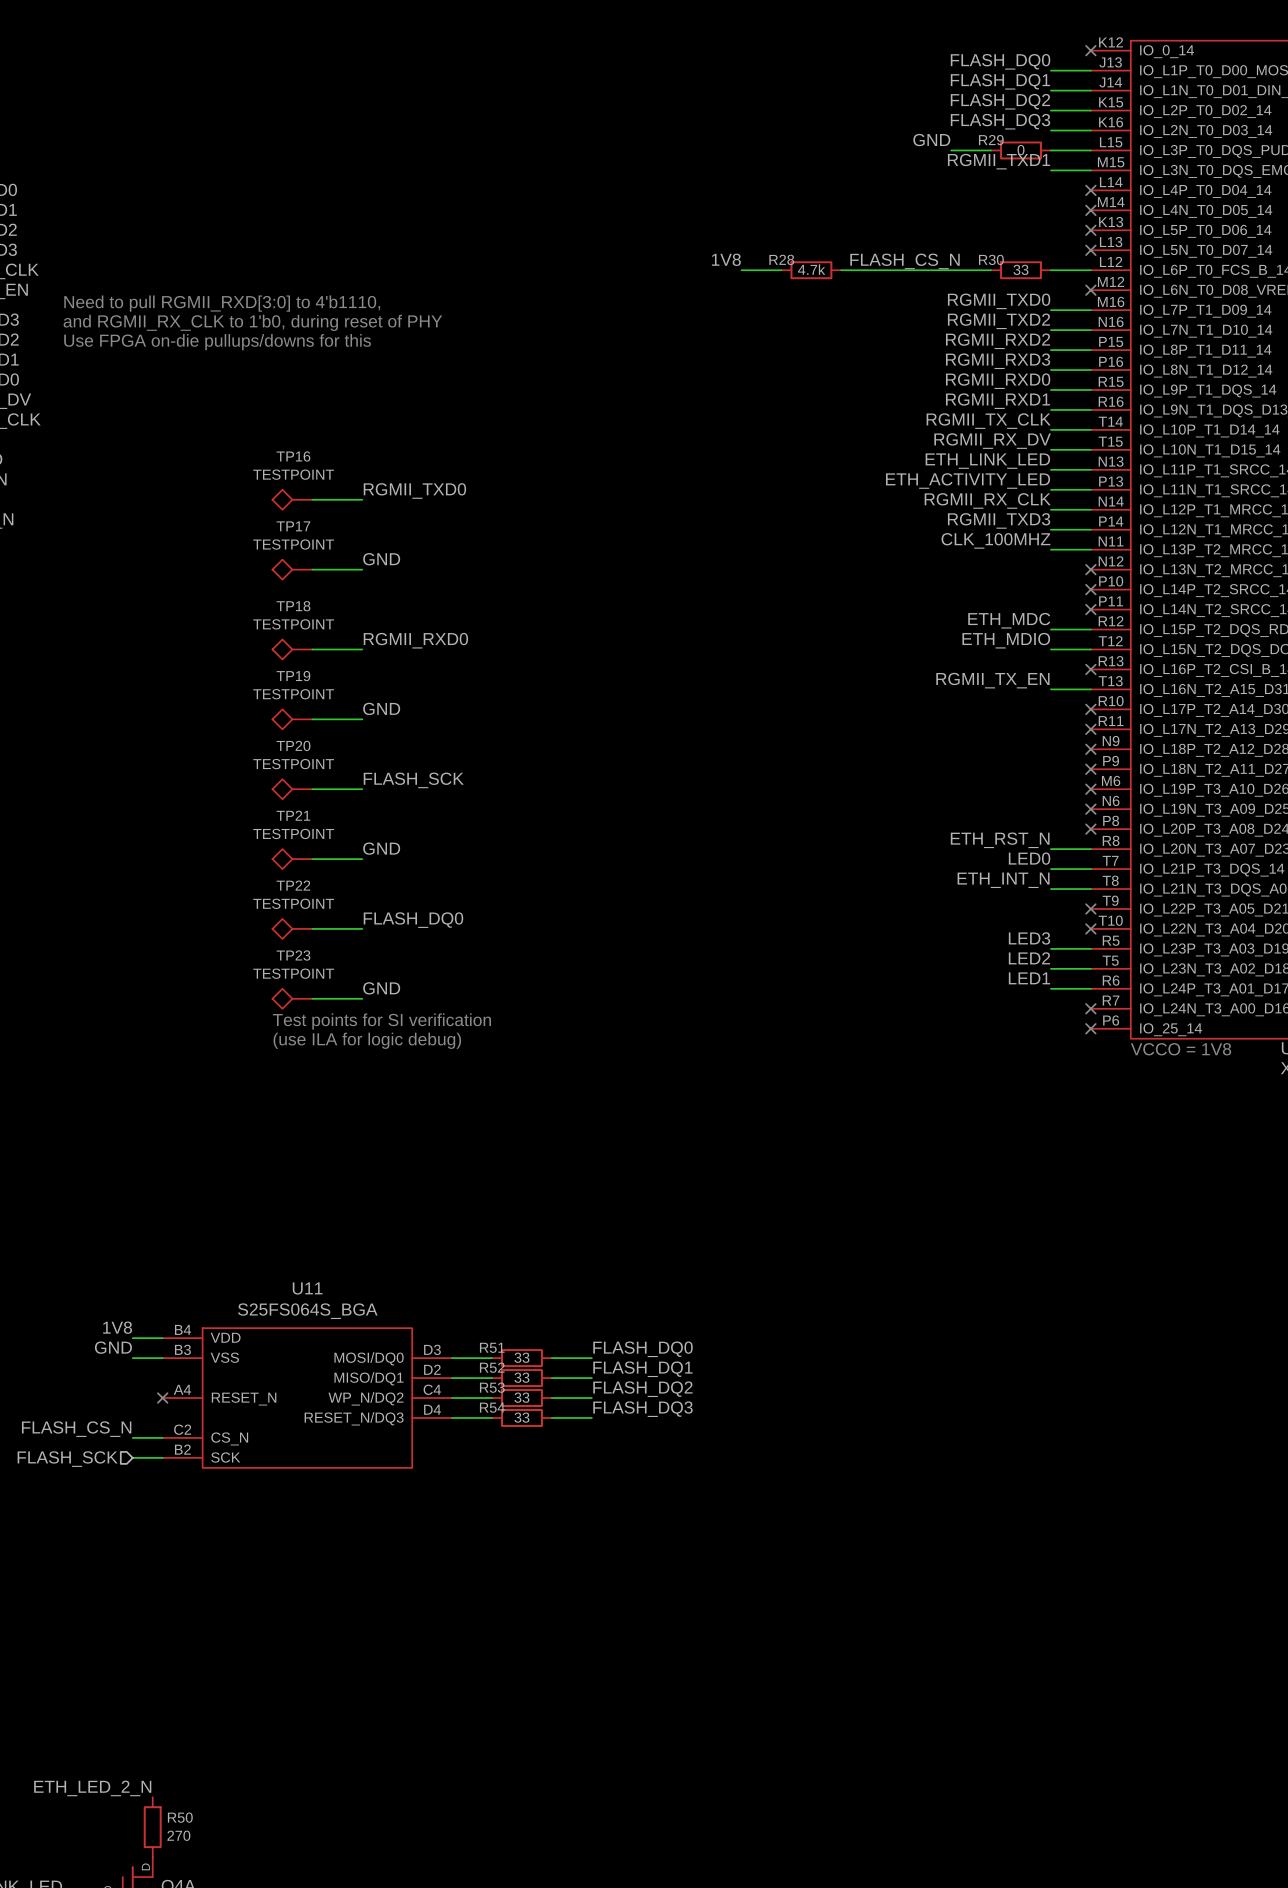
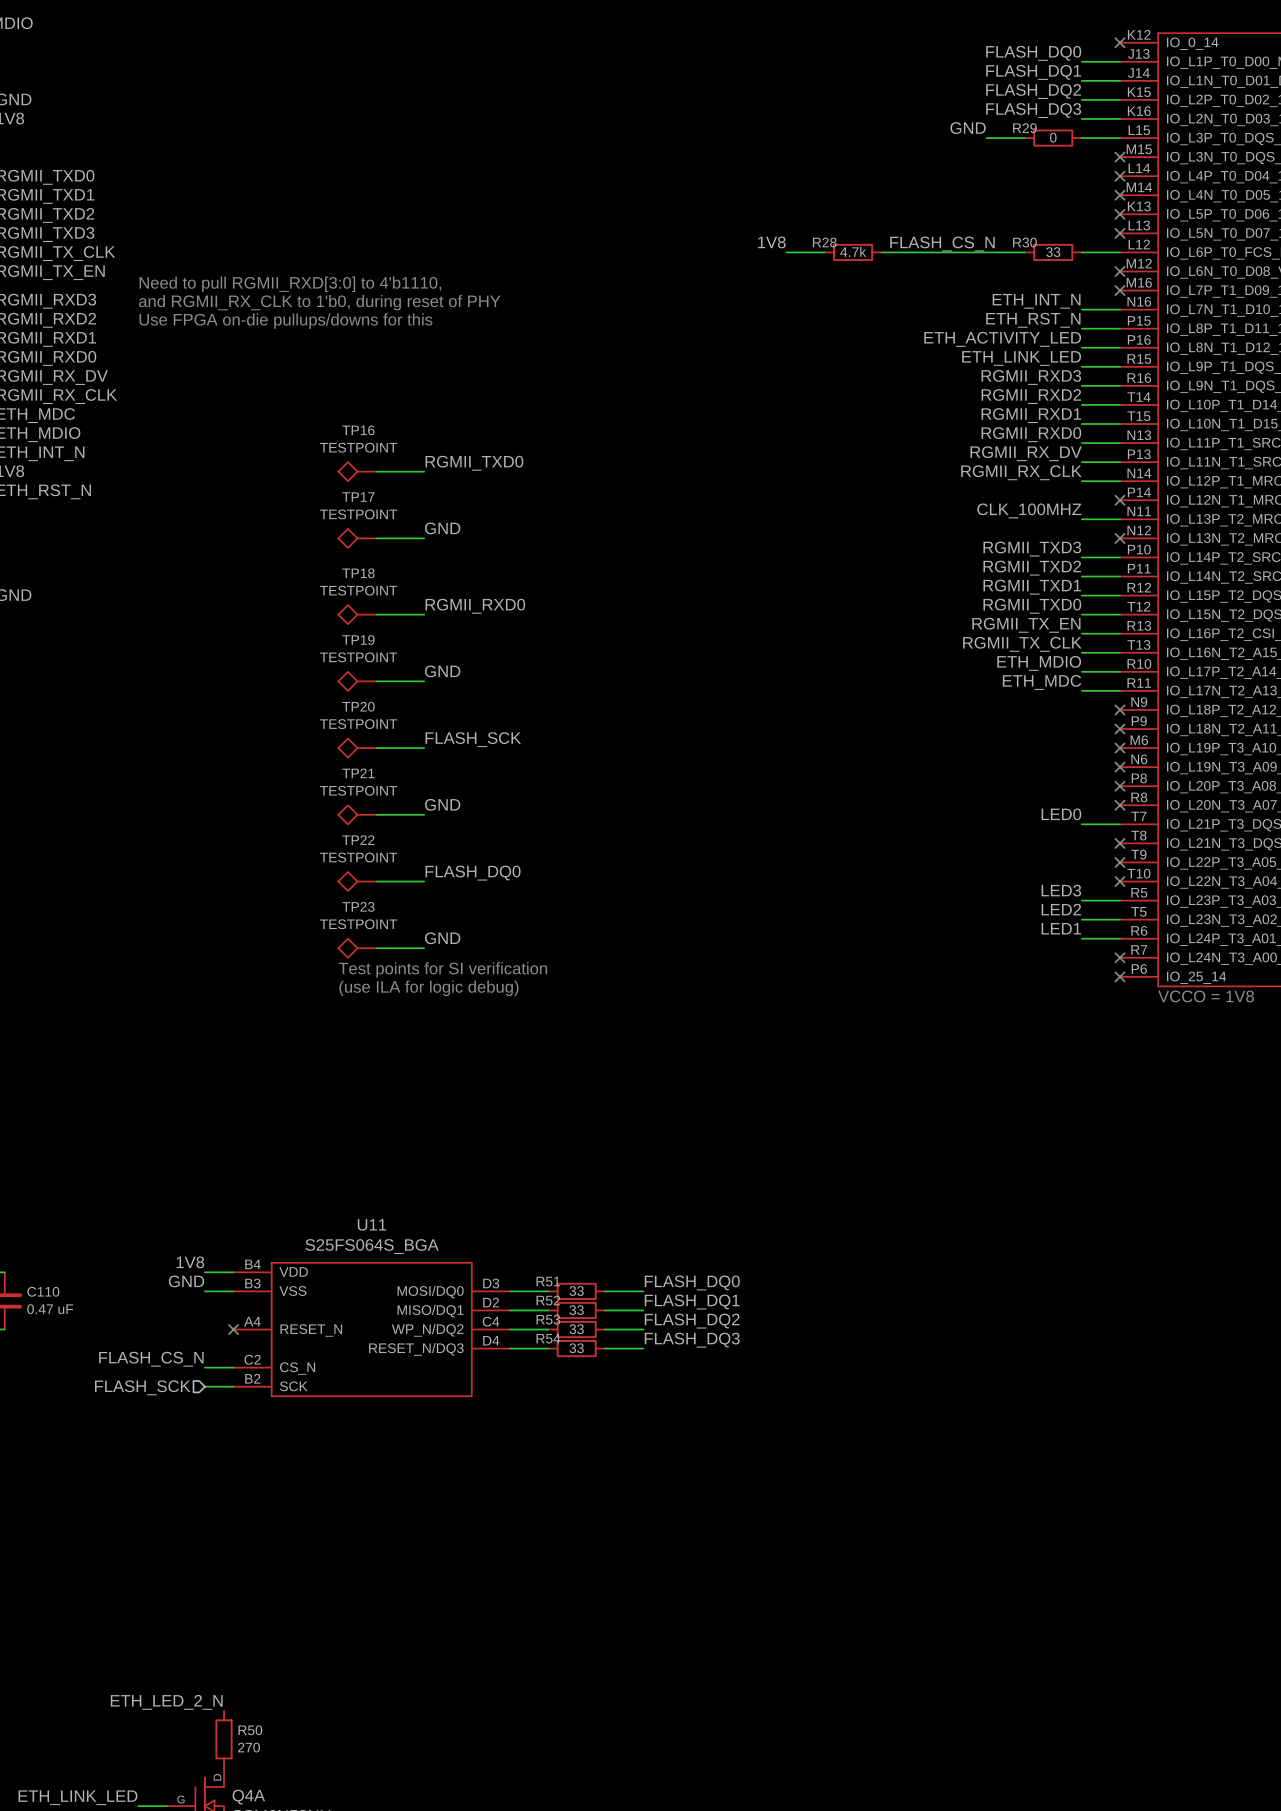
label: RGMII_TXD1 (999, 161) -> none
wire: (1050, 170) (1090, 170) -> none
no-connect mark: none -> (1119, 157)
label: RGMII_TXD0 (999, 301) -> none
wire: (1050, 310) (1090, 310) -> none
no-connect mark: none -> (1119, 290)
label: RGMII_TXD2 (998, 321) -> ETH_INT_N (1036, 301)
label: RGMII_RXD2 (998, 341) -> ETH_RST_N (1033, 320)
label: RGMII_RXD3 (998, 361) -> ETH_ACTIVITY_LED (1002, 339)
label: RGMII_RXD0 (998, 381) -> ETH_LINK_LED (1021, 358)
label: RGMII_RXD1 (998, 401) -> RGMII_RXD3 (1031, 377)
label: RGMII_TX_CLK (988, 421) -> RGMII_RXD2 (1031, 396)
label: RGMII_RX_DV (992, 441) -> RGMII_RXD1 (1031, 415)
label: ETH_LINK_LED (987, 461) -> RGMII_RXD0 (1031, 434)
label: ETH_ACTIVITY_LED (968, 481) -> RGMII_RX_DV (1026, 453)
label position: RGMII_TXD3 (999, 520) -> RGMII_TXD3 (1032, 549)
wire: (1050, 529) (1090, 529) -> (1081, 557) (1119, 557)
no-connect mark: none -> (1119, 500)
no-connect mark: (1090, 589) -> none
label: none -> RGMII_TXD2 (1032, 568)
wire: none -> (1081, 576) (1119, 576)
no-connect mark: (1090, 609) -> none
label: ETH_MDC (1009, 620) -> RGMII_TXD1 (1032, 587)
label: ETH_MDIO (1006, 640) -> RGMII_TXD0 (1032, 606)
label: none -> RGMII_TX_EN (1026, 625)
no-connect mark: (1090, 669) -> none
label: RGMII_TX_EN (992, 680) -> RGMII_TX_CLK (1022, 644)
label: none -> ETH_MDIO (1039, 663)
no-connect mark: (1090, 709) -> none
label: none -> ETH_MDC (1042, 682)
wire: none -> (1081, 690) (1119, 690)
no-connect mark: (1090, 729) -> none
label: ETH_RST_N (1000, 840) -> none
wire: (1050, 849) (1090, 849) -> (1081, 633) (1119, 633)
no-connect mark: none -> (1119, 805)
label: ETH_INT_N (1003, 880) -> none
wire: (1050, 889) (1090, 889) -> (1081, 671) (1119, 671)
no-connect mark: none -> (1119, 843)

